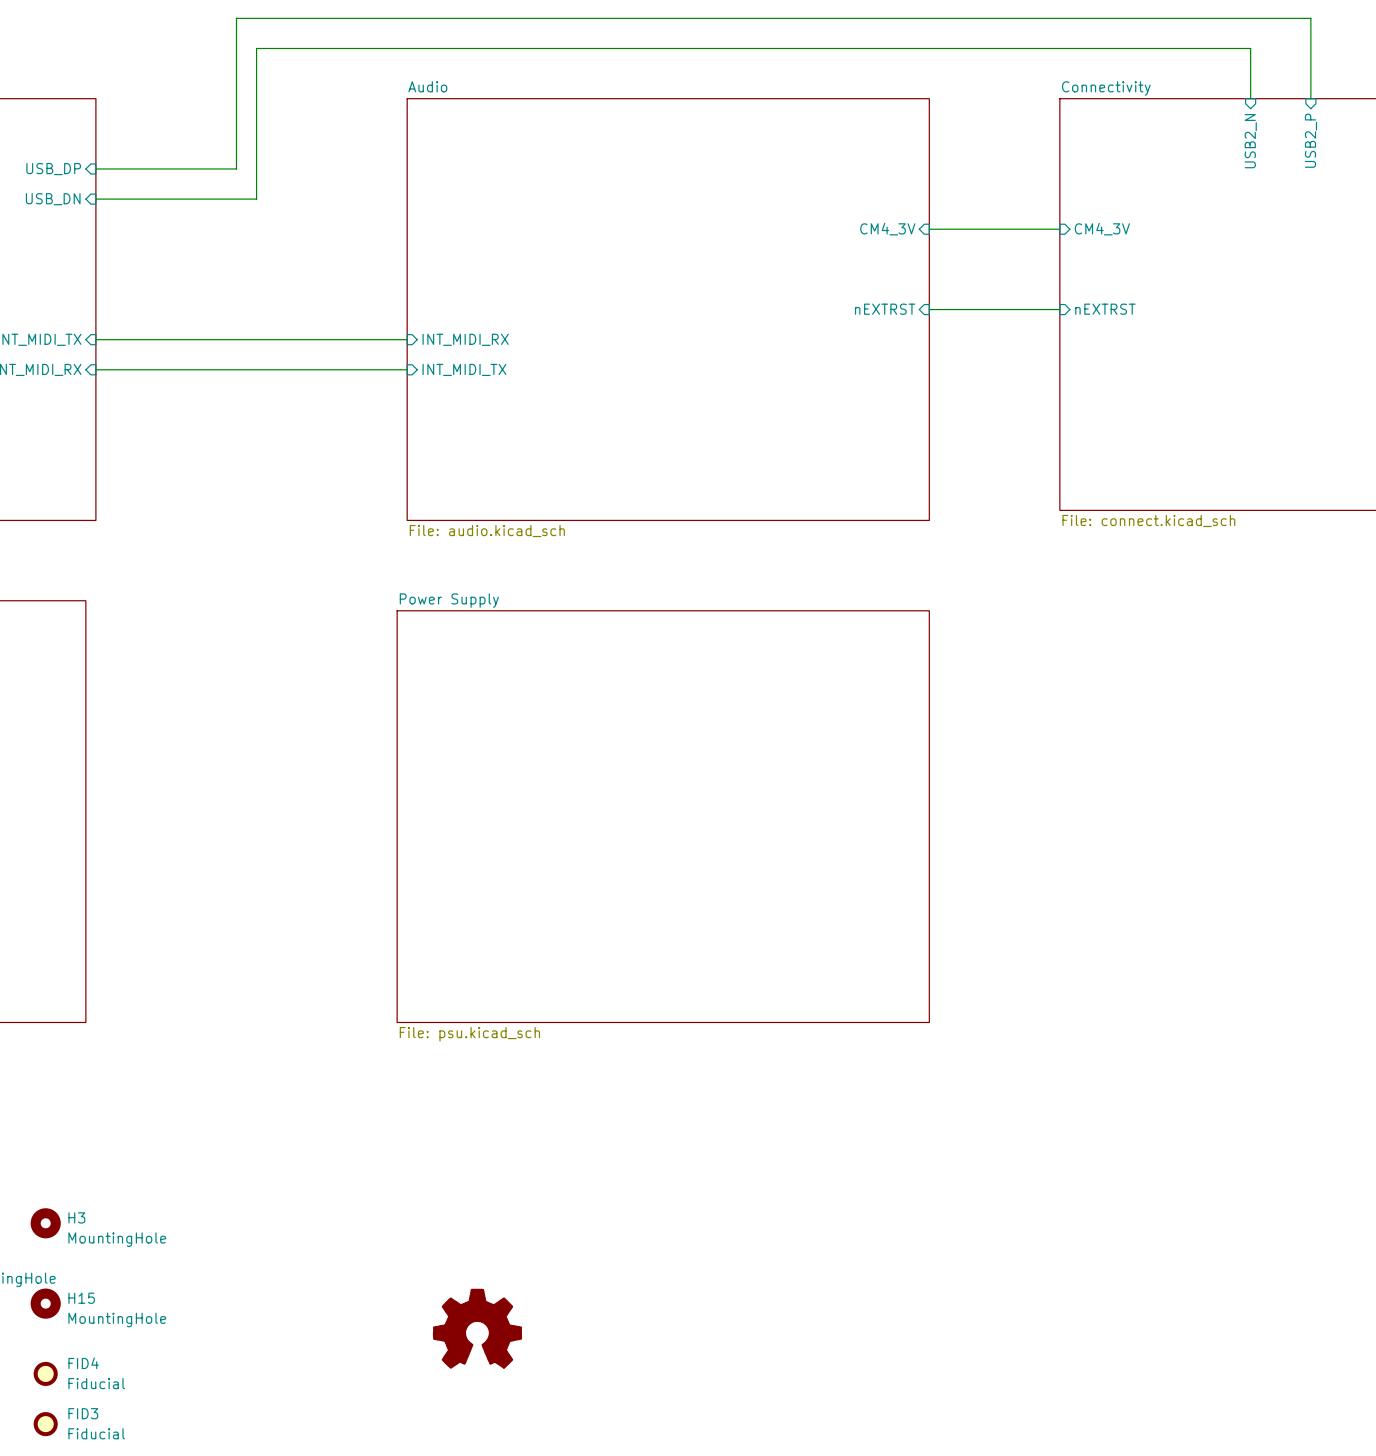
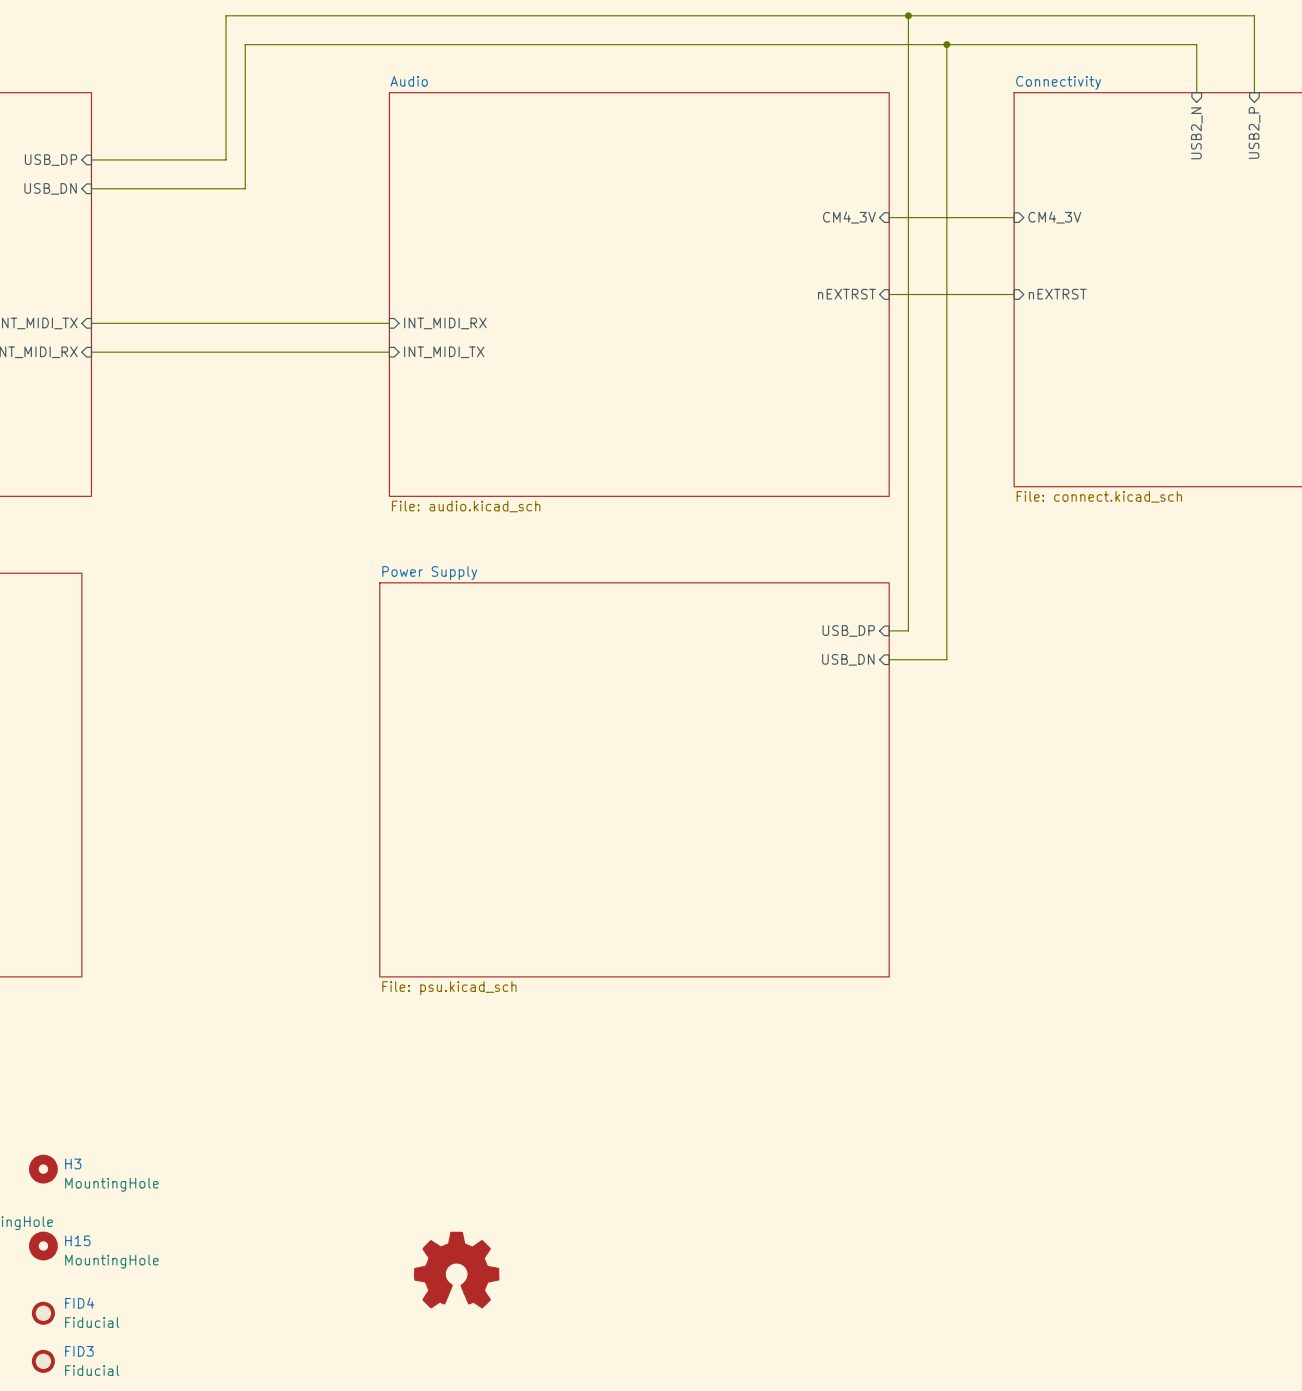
wire: none -> (908, 15) (908, 630) (889, 630)
junction: none -> (908, 15)
wire: none -> (946, 44) (946, 659) (889, 659)
junction: none -> (946, 44)
sheet pin: none -> USB_DP (848, 630)
sheet pin: none -> USB_DN (848, 659)

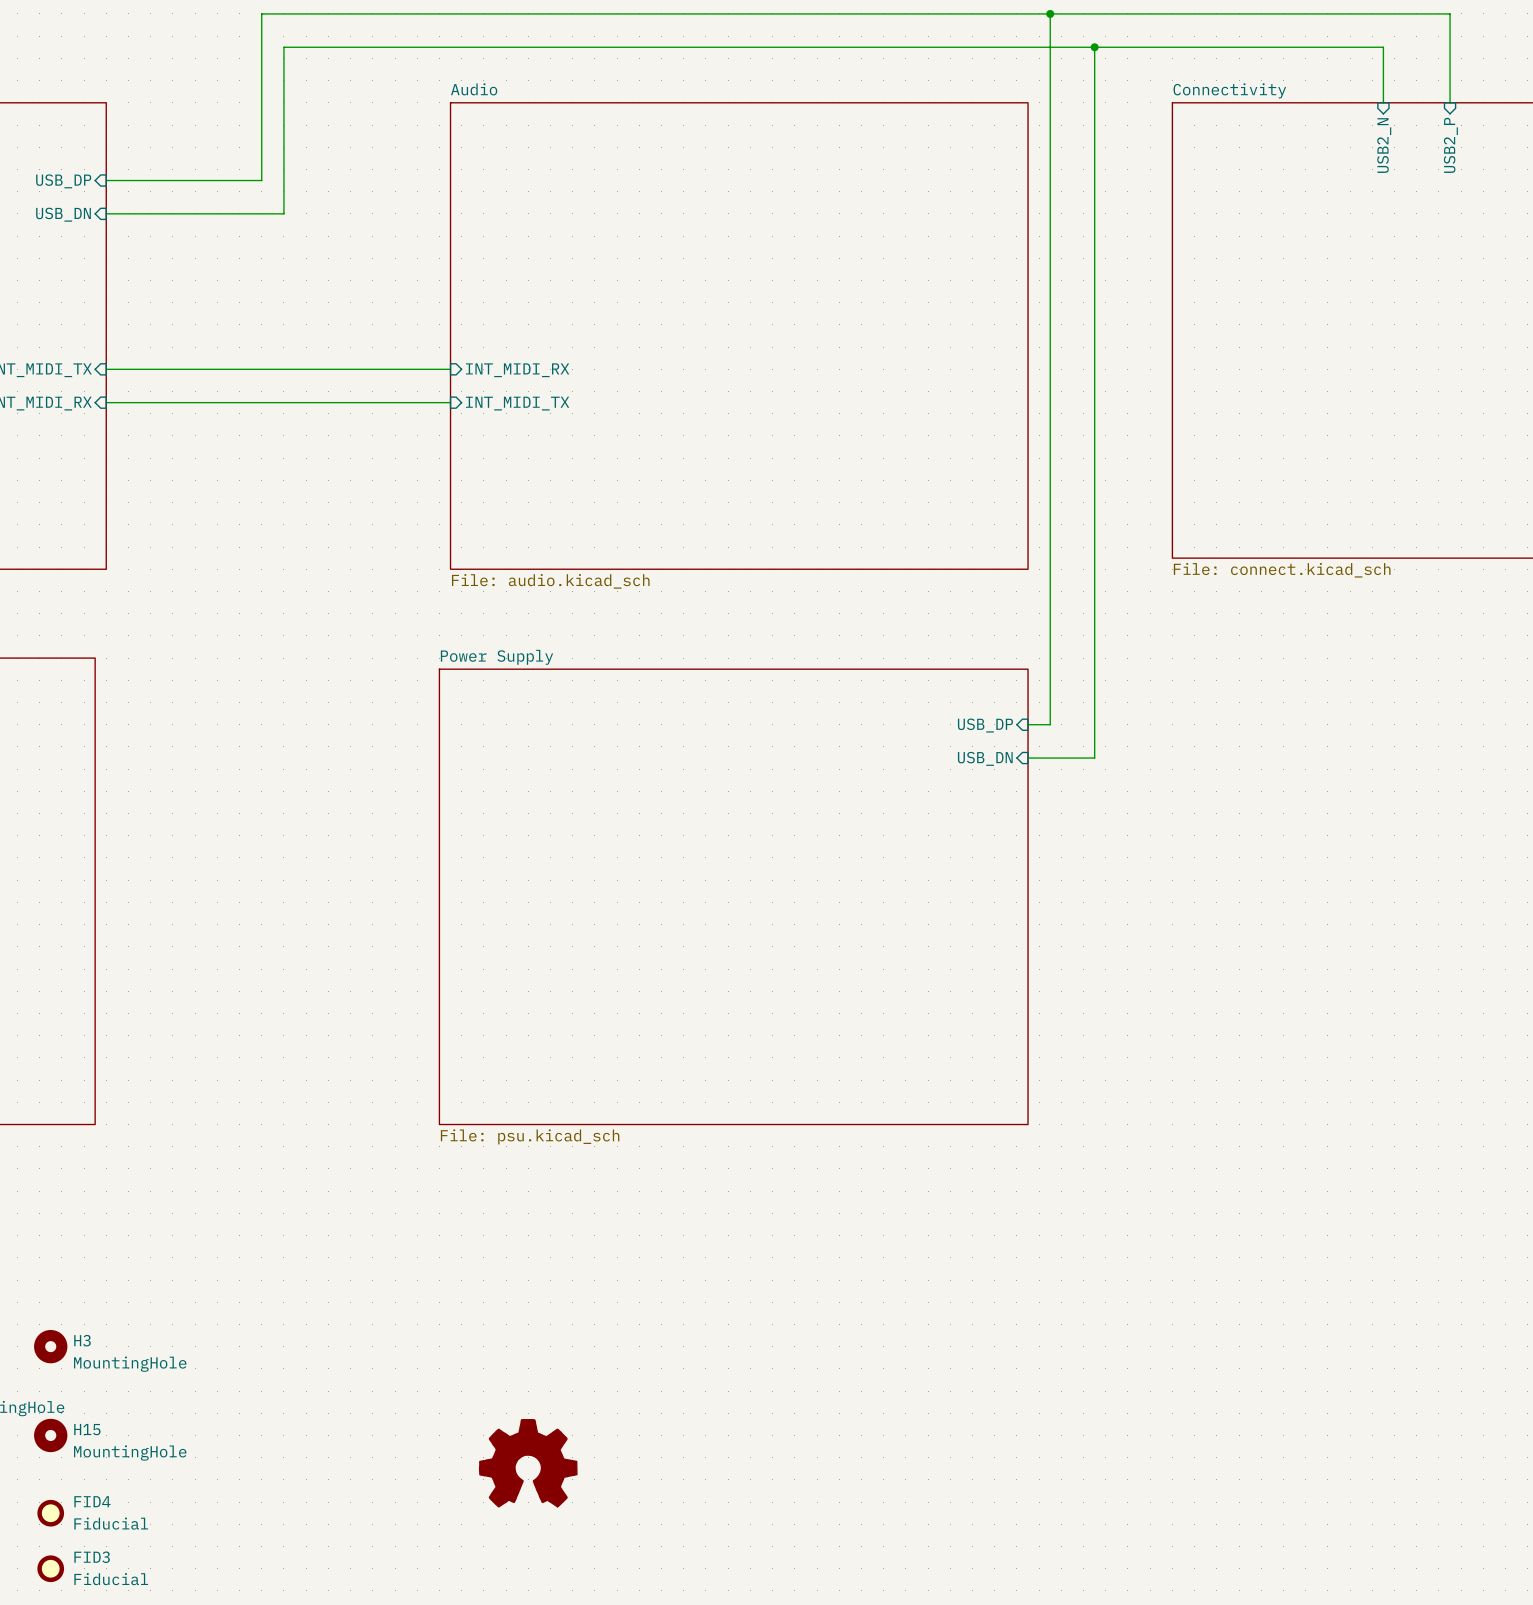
sheet pin: CM4_3V (849, 217) -> none
wire: (889, 217) (1014, 217) -> none
sheet pin: CM4_3V (1054, 217) -> none
sheet pin: nEXTRST (846, 294) -> none
wire: (889, 294) (1014, 294) -> none
sheet pin: nEXTRST (1057, 294) -> none

